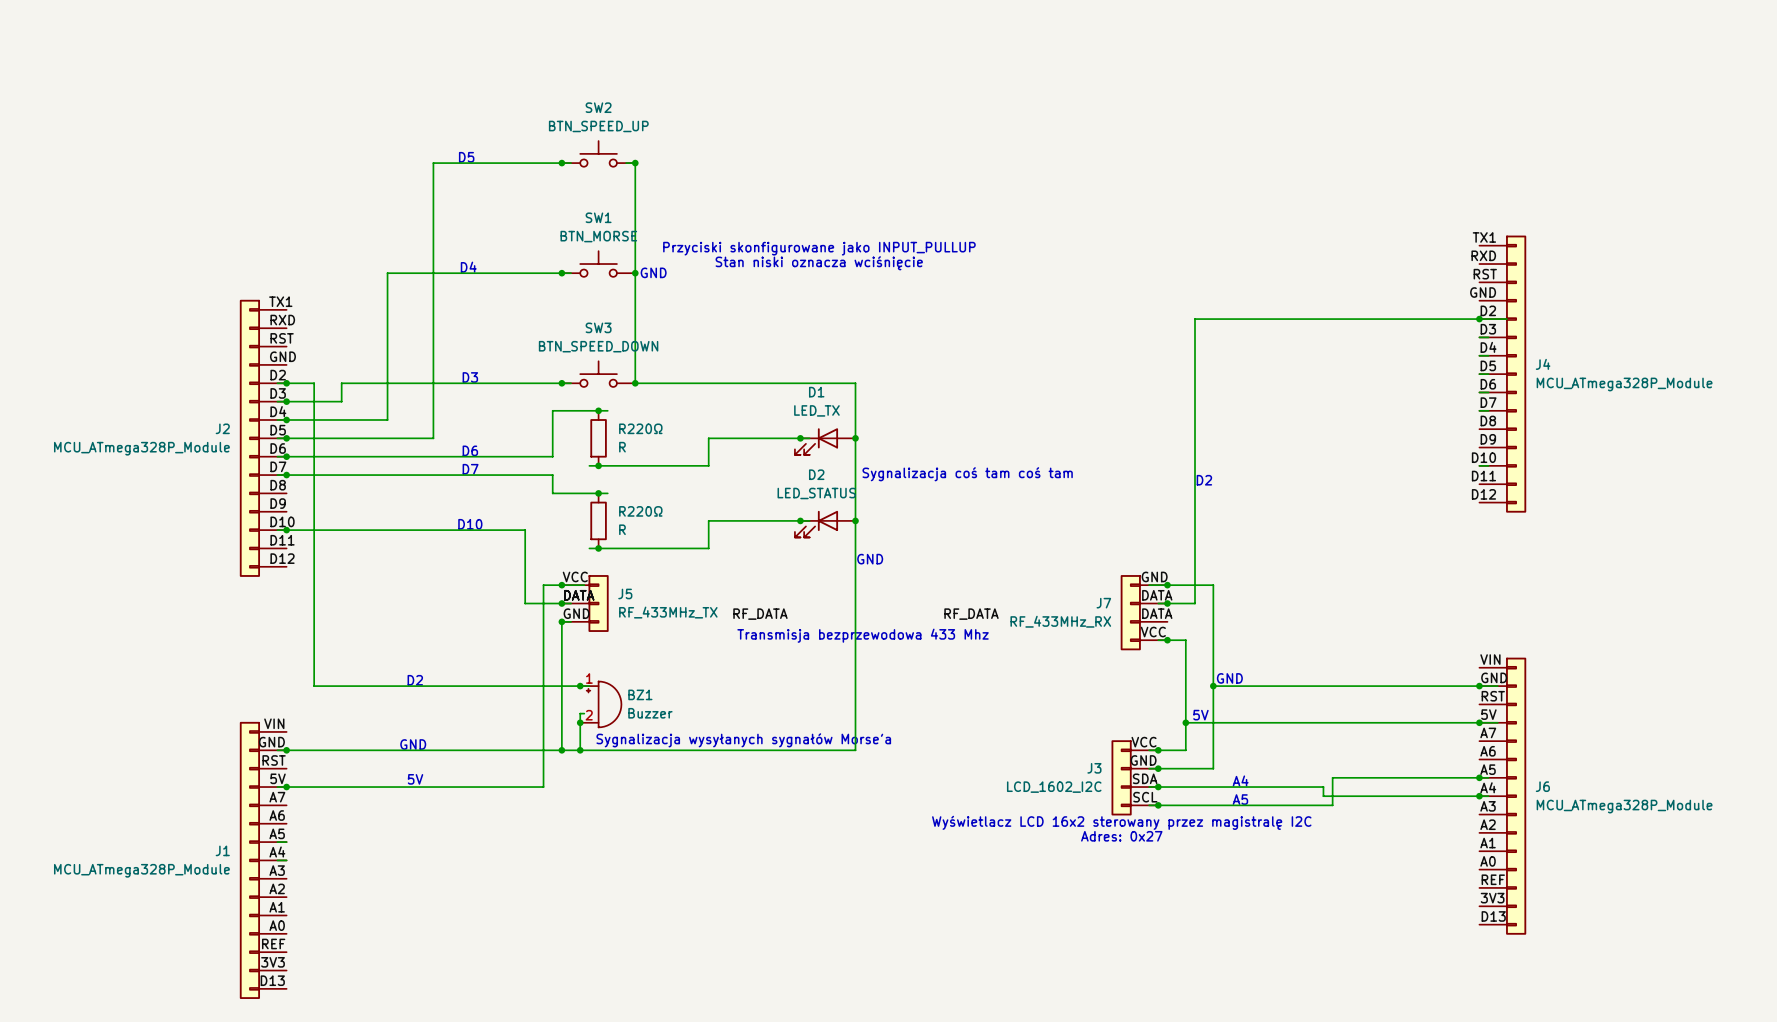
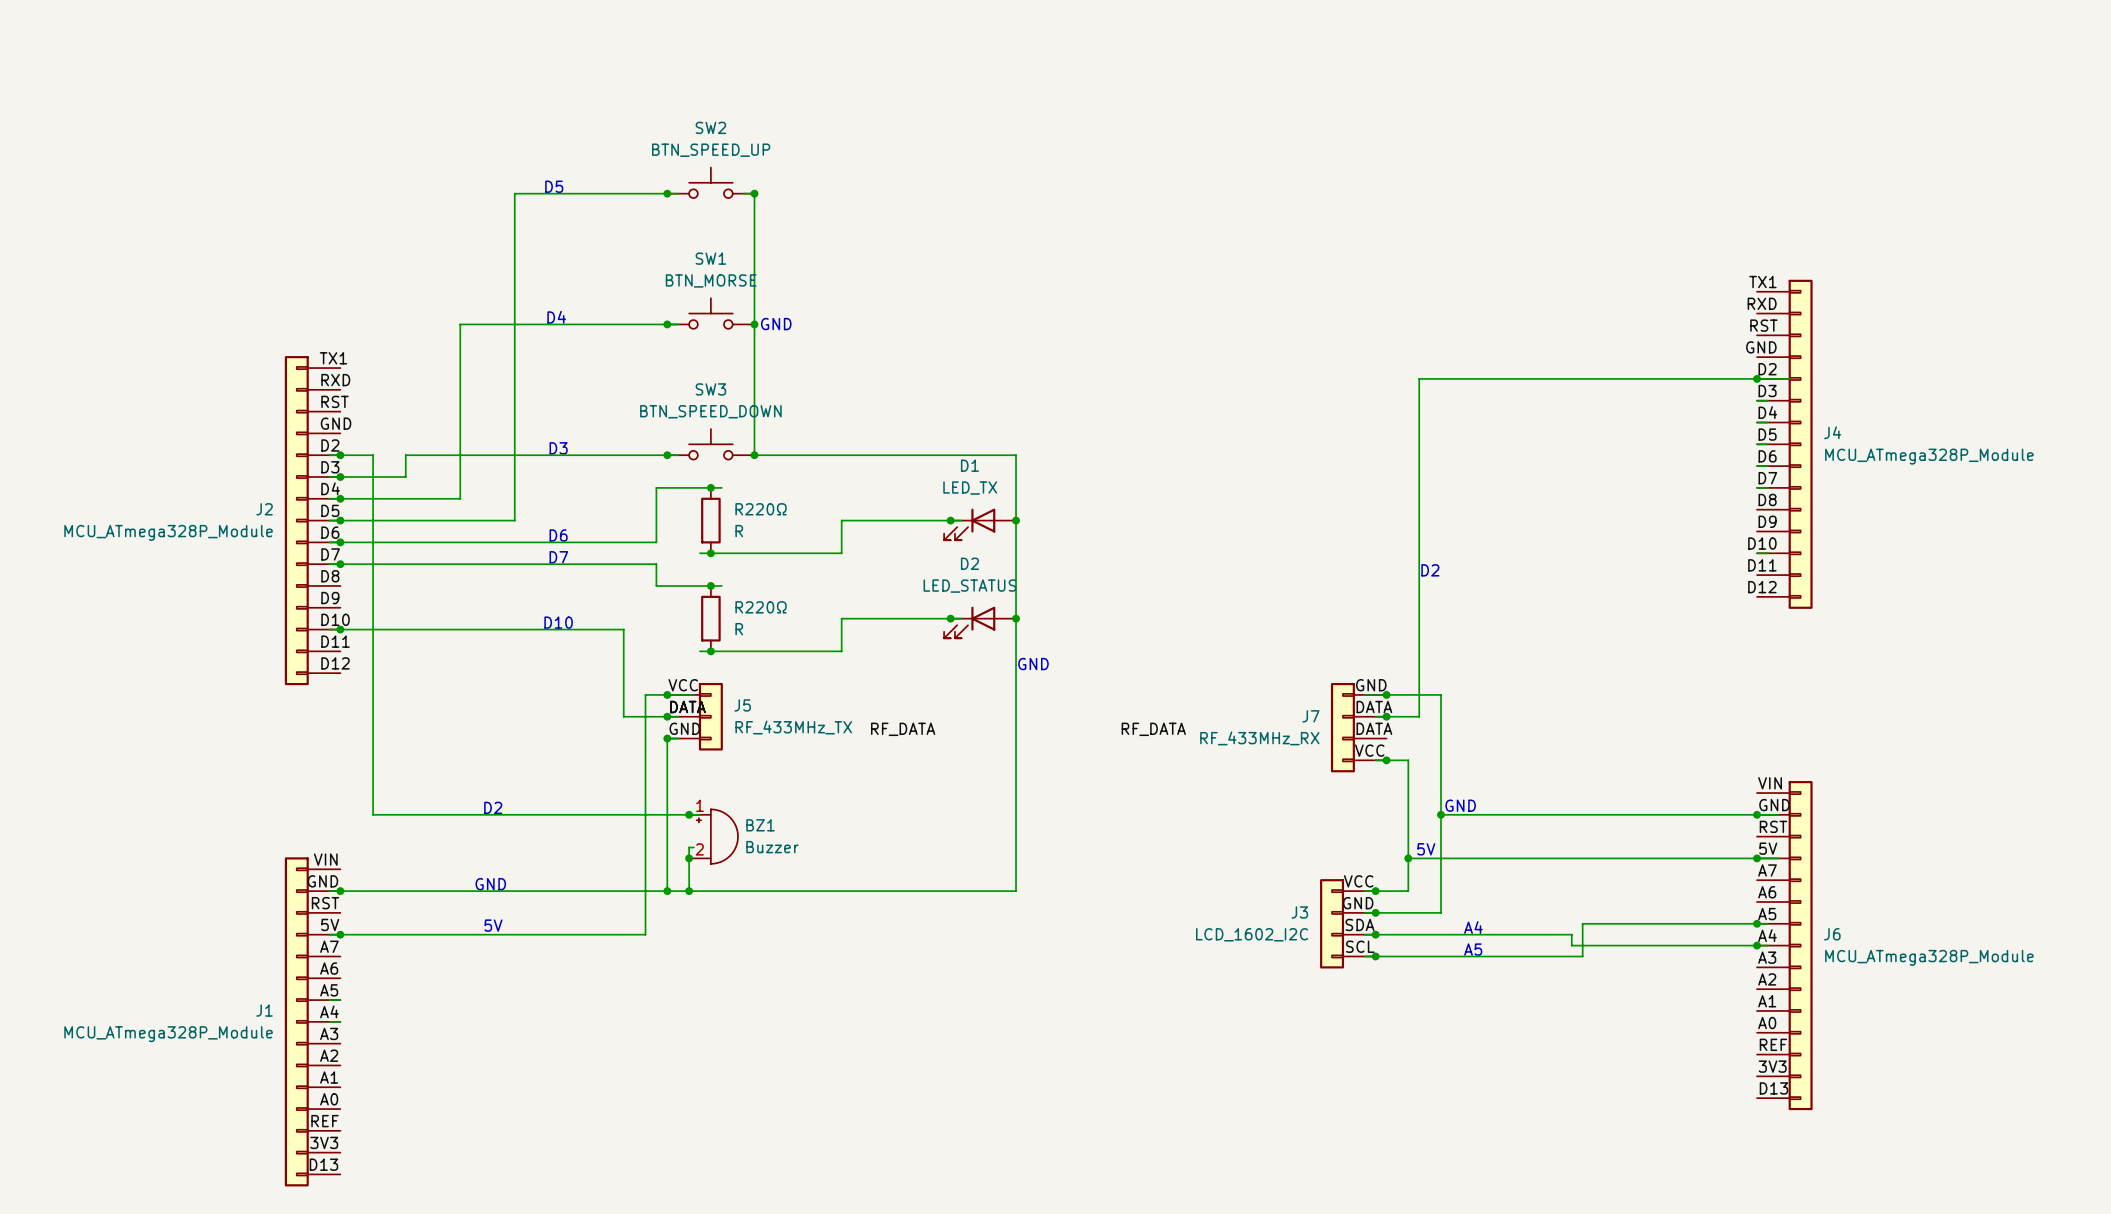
text: Przyciski skonfigurowane jako INPUT_PULLUP (819, 248) -> none
text: Stan niski oznacza wciśnięcie (819, 263) -> none
text: Sygnalizacja coś tam coś tam (967, 474) -> none
text: Transmisja bezprzewodowa 433 Mhz (863, 635) -> none
text: Sygnalizacja wysyłanych sygnałów Morse'a (743, 740) -> none
text: Wyświetlacz LCD 16x2 sterowany przez magistralę I2C (1121, 822) -> none
text: Adres: 0x27 (1121, 836) -> none

